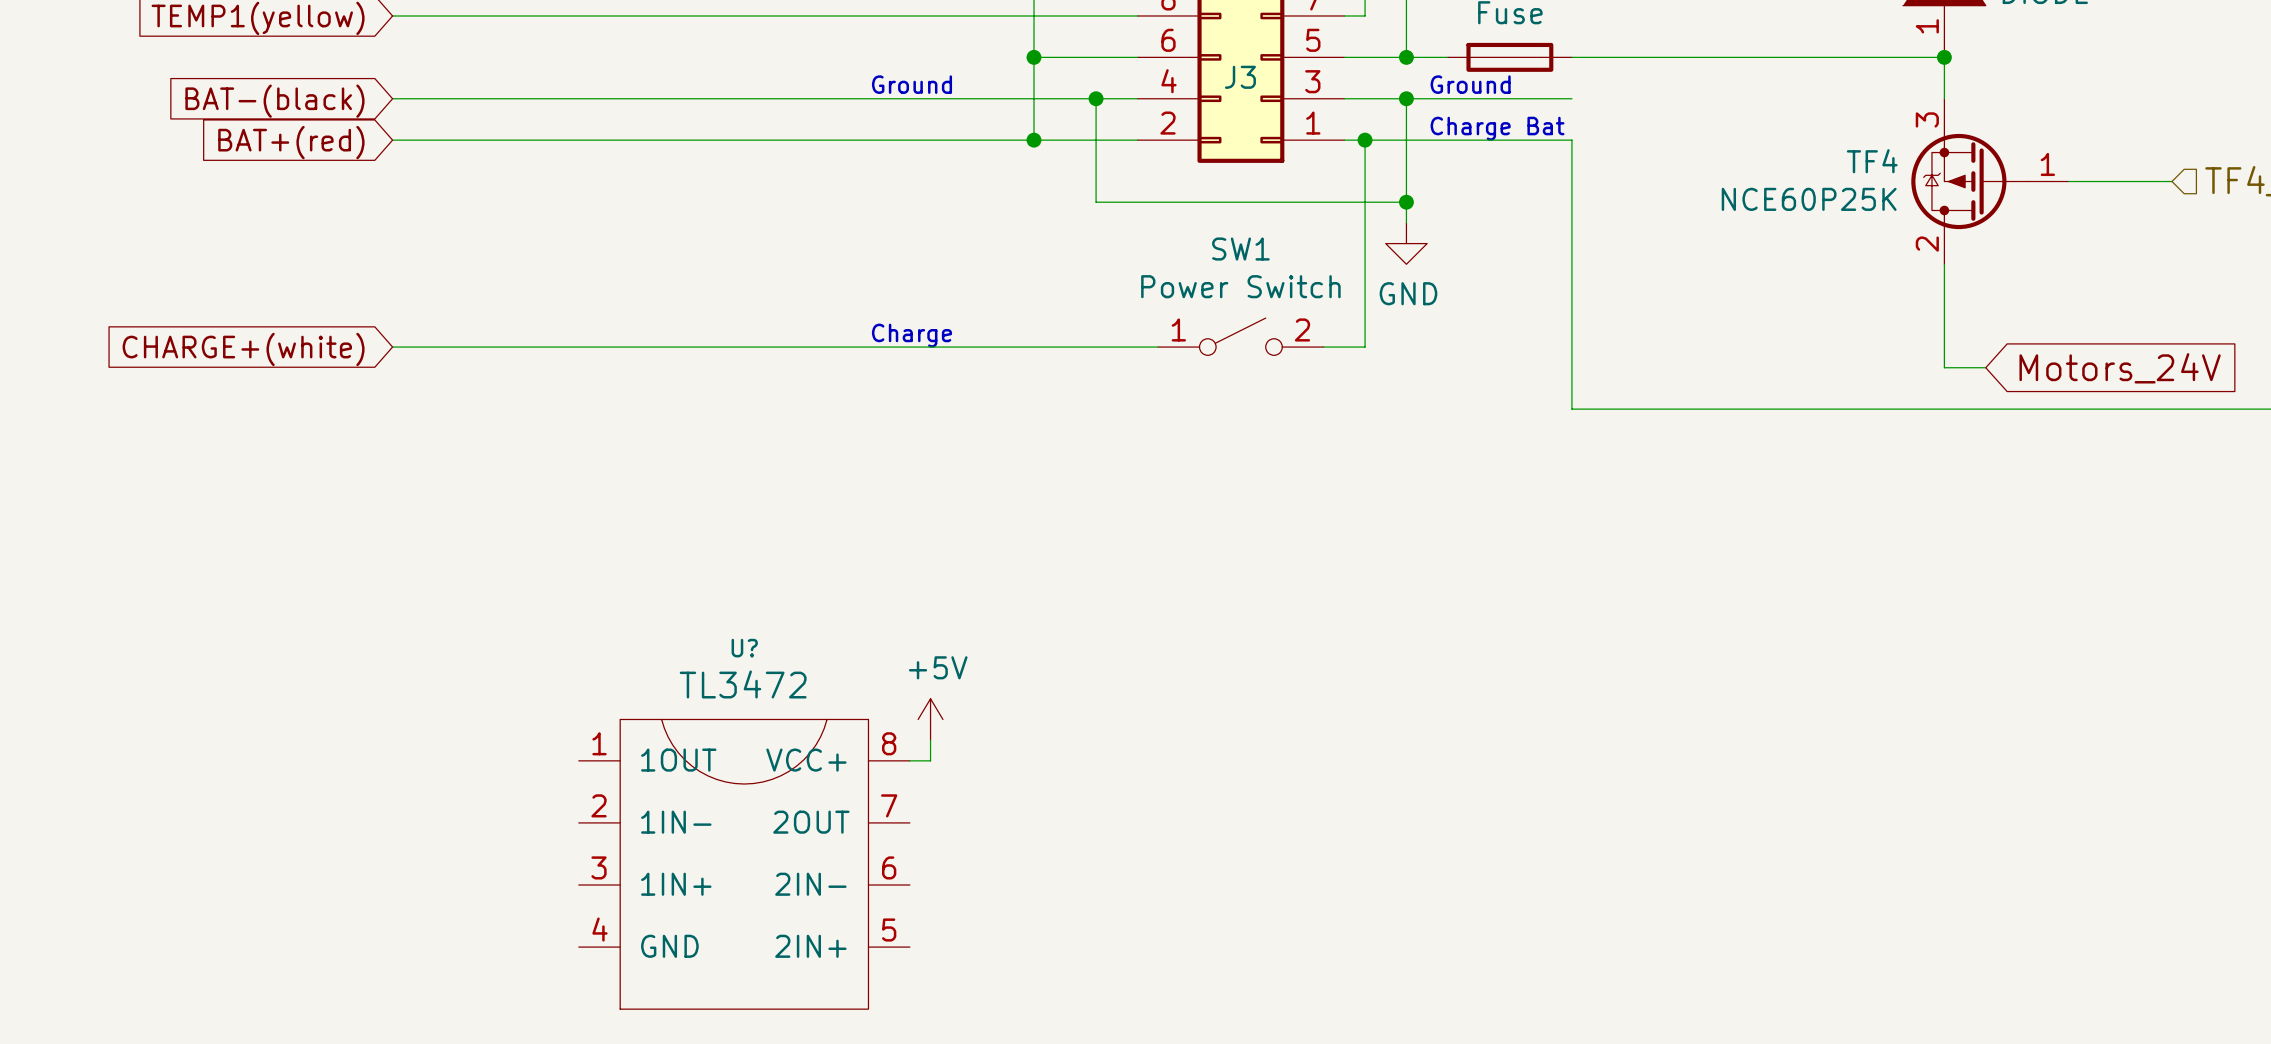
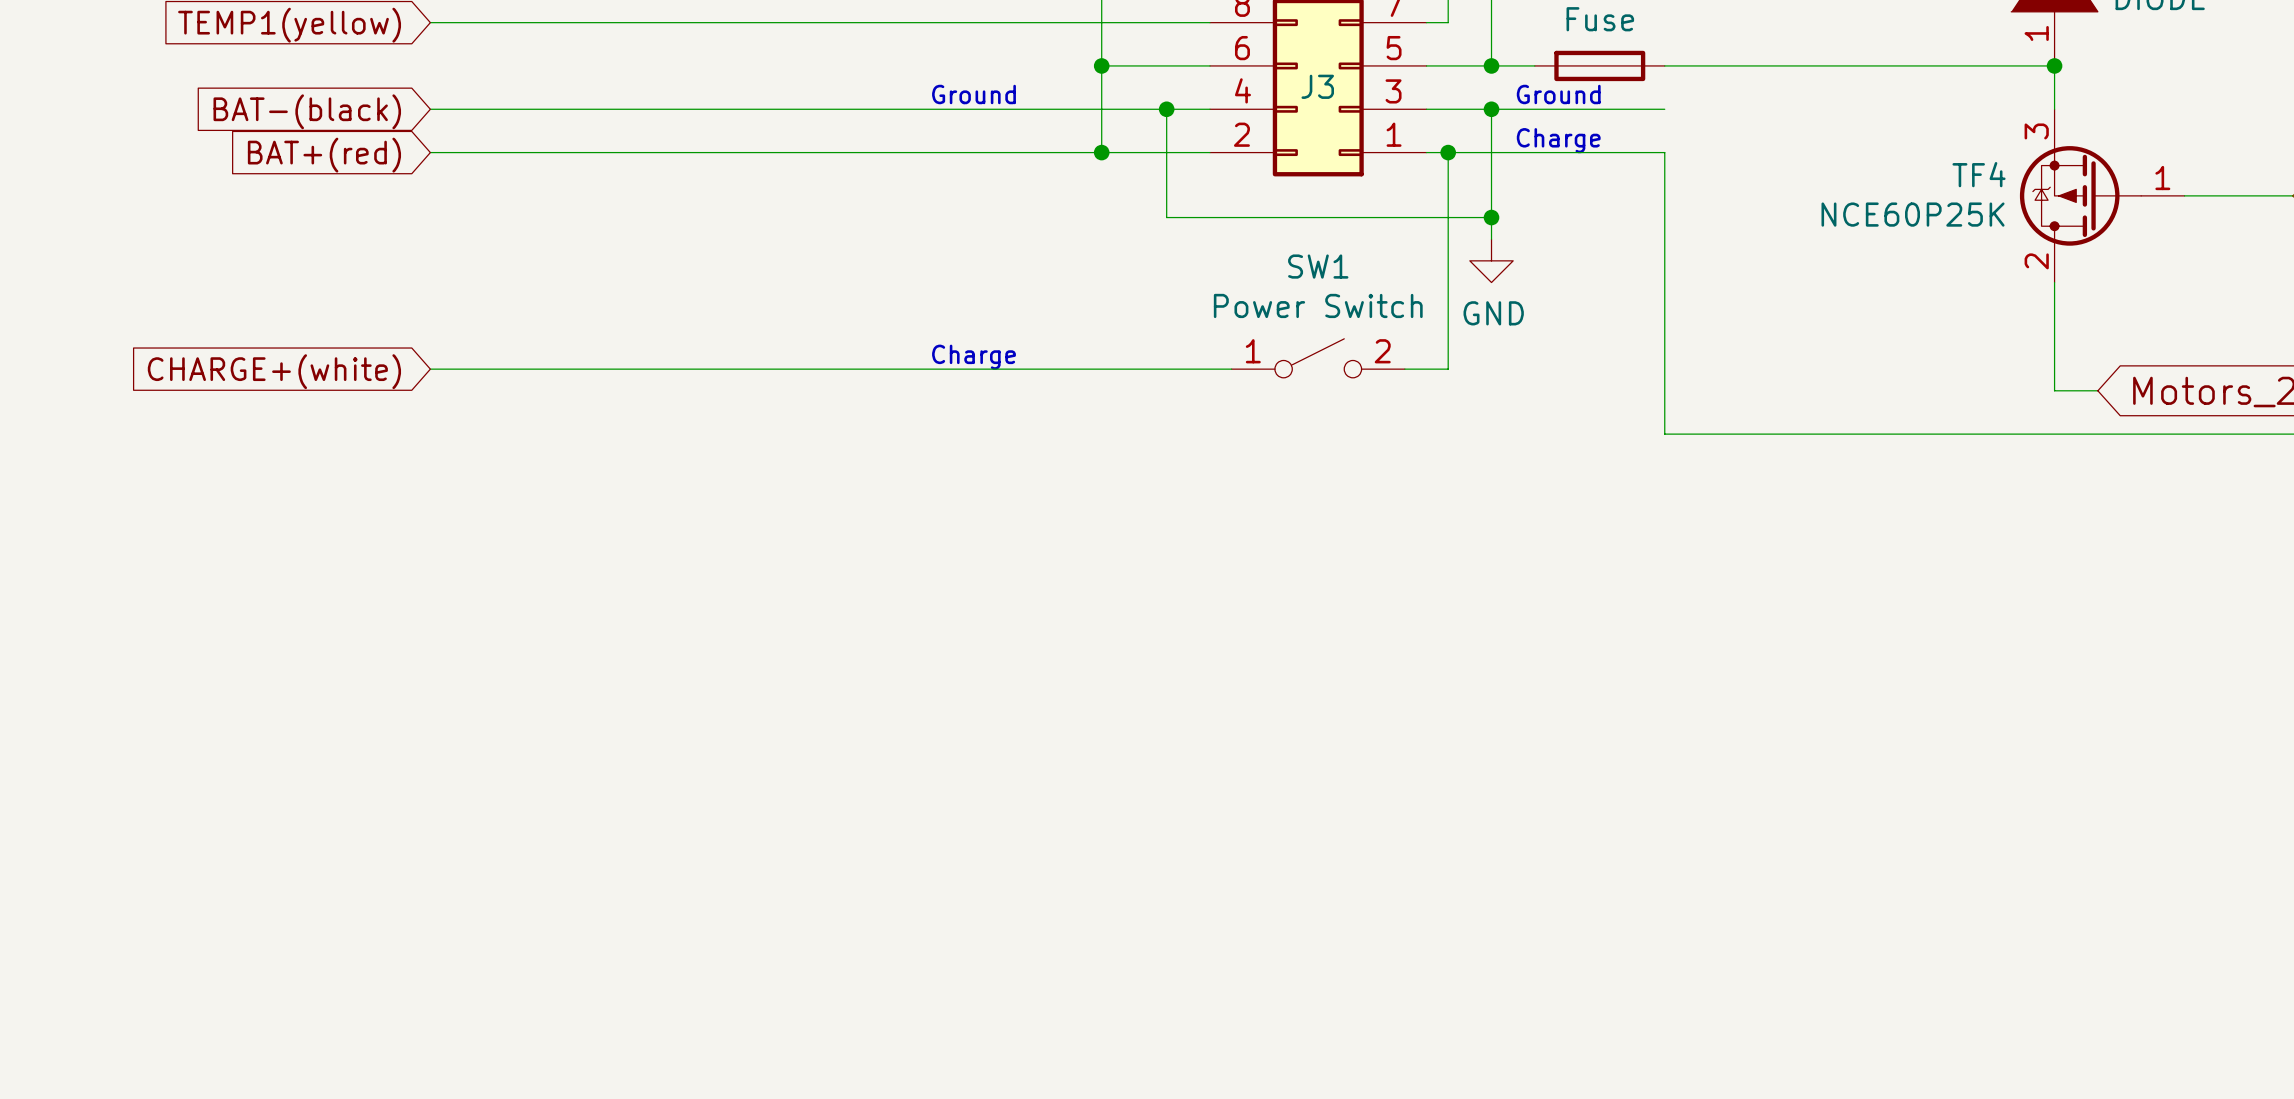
text: Charge Bat (1497, 128) -> Charge (1558, 140)
power symbol: +5V (930, 719) -> none
wire: (930, 740) (930, 760) (909, 760) -> none
U?: TL3472 (744, 864) -> none

